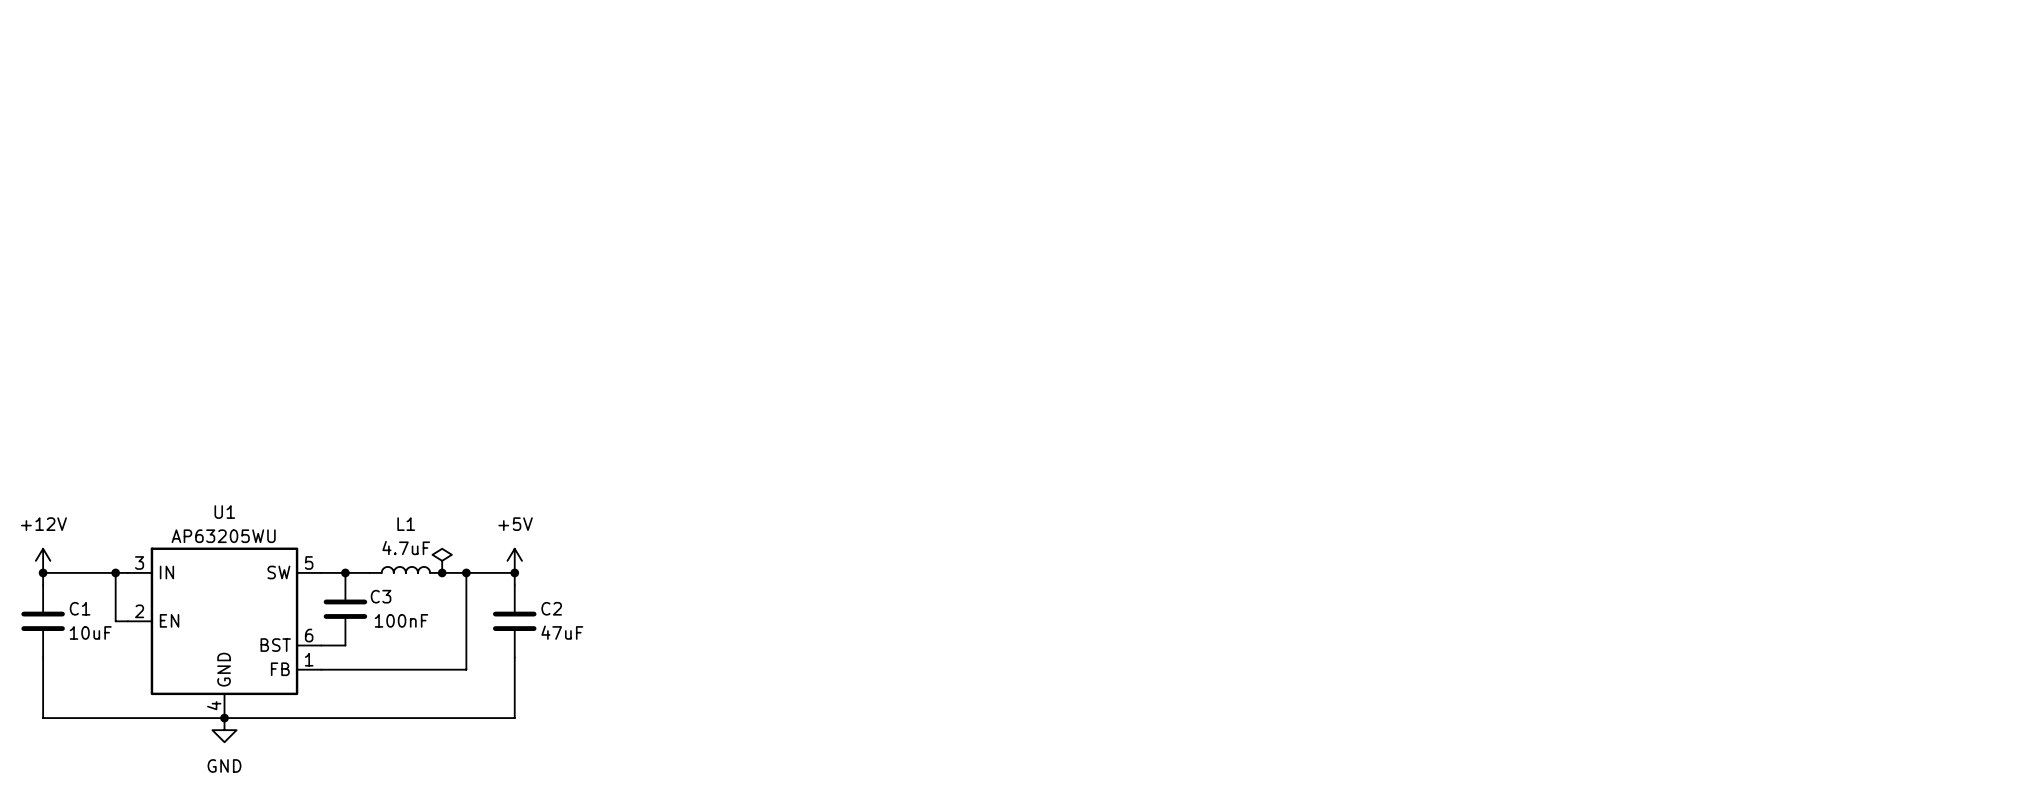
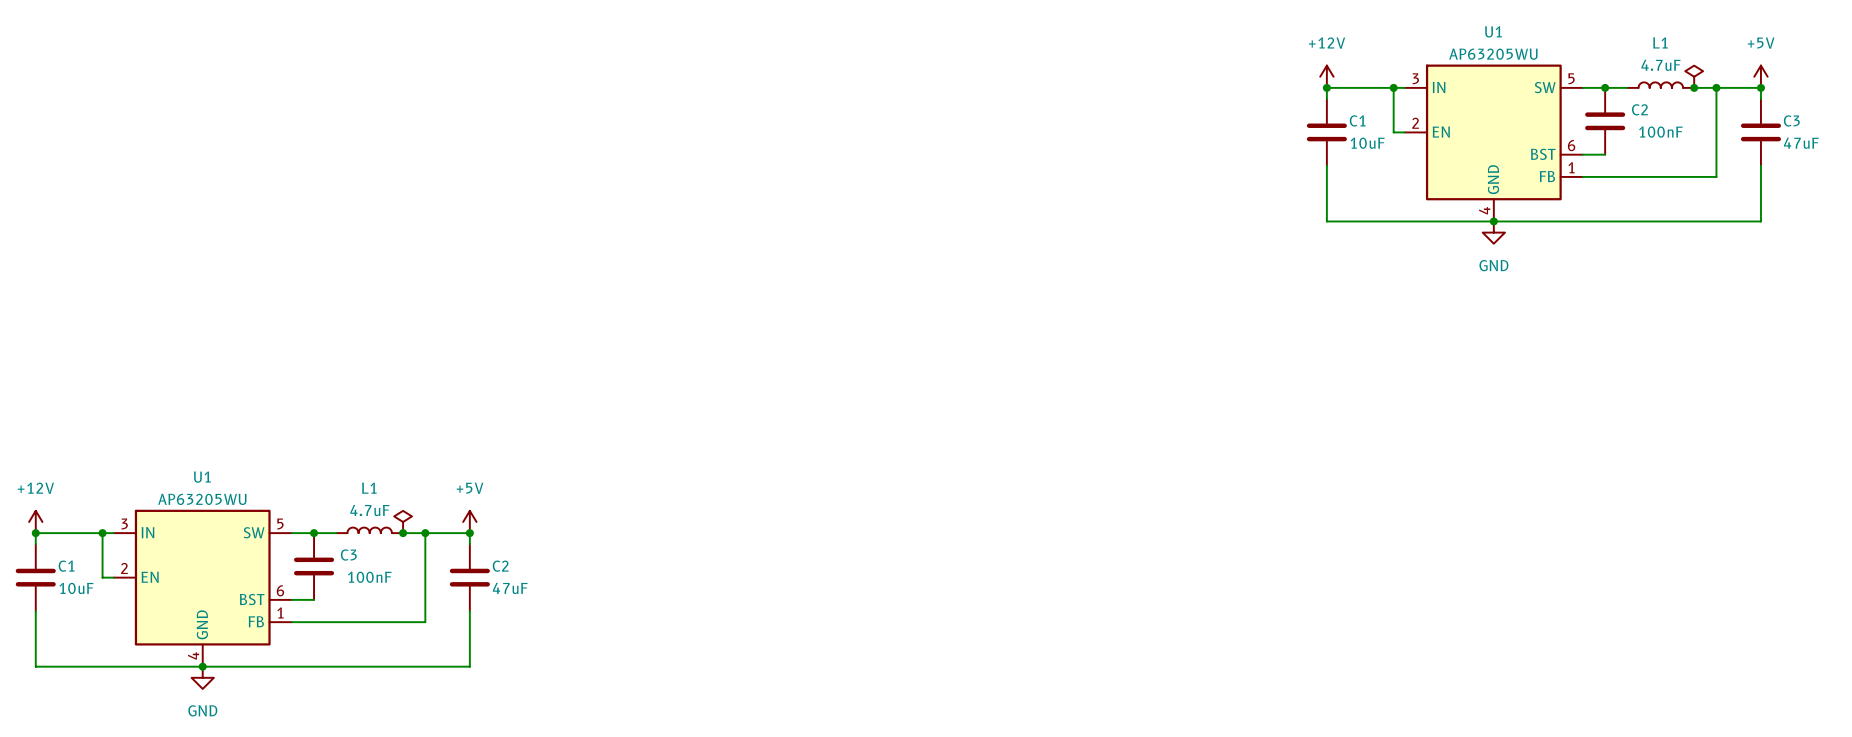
power symbol: none -> +12V (1326, 76)
power symbol: none -> (1694, 76)
power symbol: none -> +5V (1760, 76)
L1: none -> 4.7uF (1660, 85)
junction: none -> (1326, 87)
wire: none -> (1393, 87) (1393, 132) (1404, 132)
junction: none -> (1393, 87)
wire: none -> (1404, 87) (1326, 87) (1326, 99)
wire: none -> (1582, 87) (1627, 87)
junction: none -> (1605, 87)
wire: none -> (1694, 87) (1760, 87) (1760, 99)
junction: none -> (1694, 87)
wire: none -> (1716, 87) (1716, 176) (1582, 176)
junction: none -> (1716, 87)
junction: none -> (1760, 87)
C2: none -> 100nF (1605, 121)
C1: none -> 10uF (1326, 132)
C3: none -> 47uF (1760, 132)
U1: none -> AP63205WU (1493, 143)
wire: none -> (1582, 154) (1605, 154)
wire: none -> (1326, 165) (1326, 221) (1760, 221) (1760, 165)
junction: none -> (1493, 221)
power symbol: none -> GND (1493, 232)

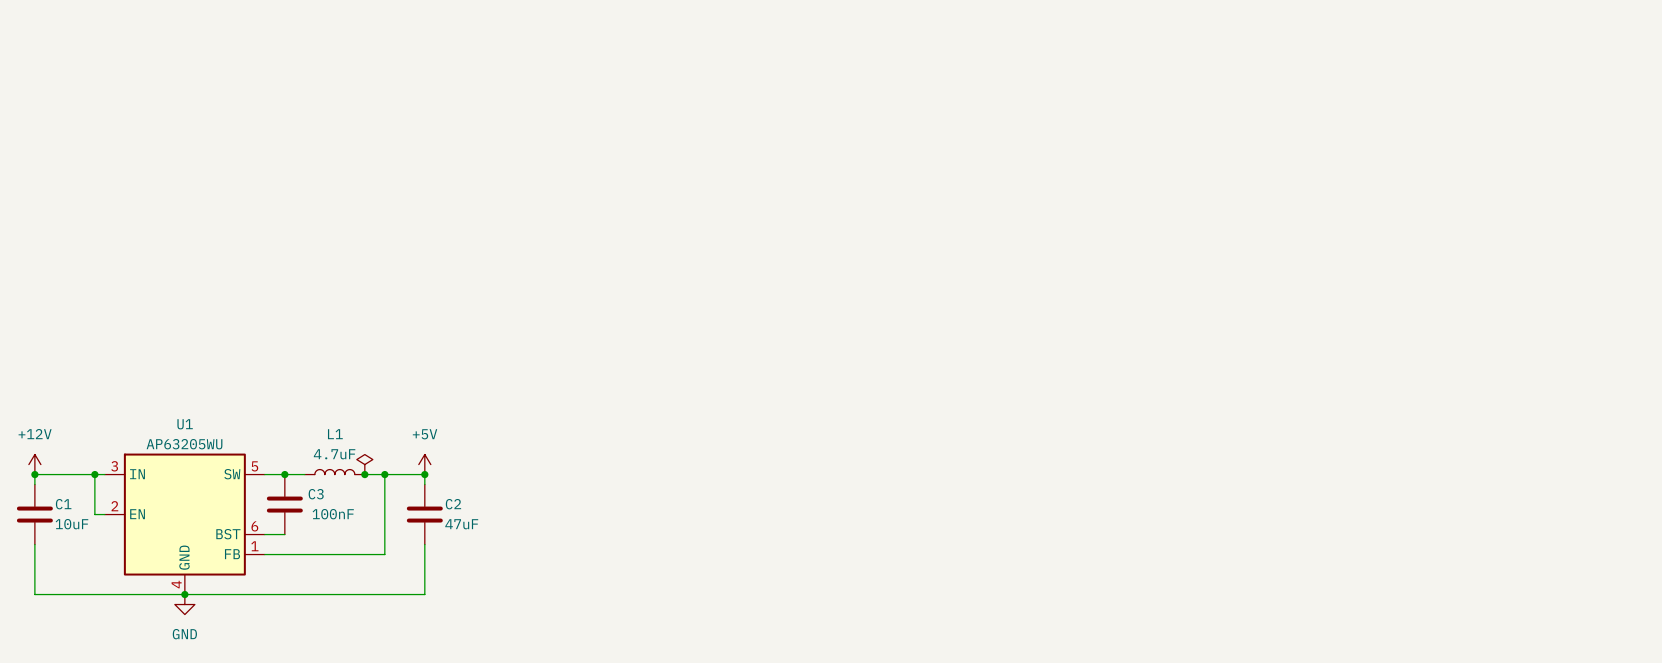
power symbol: +12V (1326, 76) -> none
power symbol: (1694, 76) -> none
power symbol: +5V (1760, 76) -> none
L1: 4.7uF (1660, 85) -> none
junction: (1326, 87) -> none
wire: (1393, 87) (1393, 132) (1404, 132) -> none
junction: (1393, 87) -> none
wire: (1404, 87) (1326, 87) (1326, 99) -> none
wire: (1582, 87) (1627, 87) -> none
junction: (1605, 87) -> none
wire: (1694, 87) (1760, 87) (1760, 99) -> none
junction: (1694, 87) -> none
wire: (1716, 87) (1716, 176) (1582, 176) -> none
junction: (1716, 87) -> none
junction: (1760, 87) -> none
C2: 100nF (1605, 121) -> none
C1: 10uF (1326, 132) -> none
C3: 47uF (1760, 132) -> none
U1: AP63205WU (1493, 143) -> none
wire: (1582, 154) (1605, 154) -> none
wire: (1326, 165) (1326, 221) (1760, 221) (1760, 165) -> none
junction: (1493, 221) -> none
power symbol: GND (1493, 232) -> none

